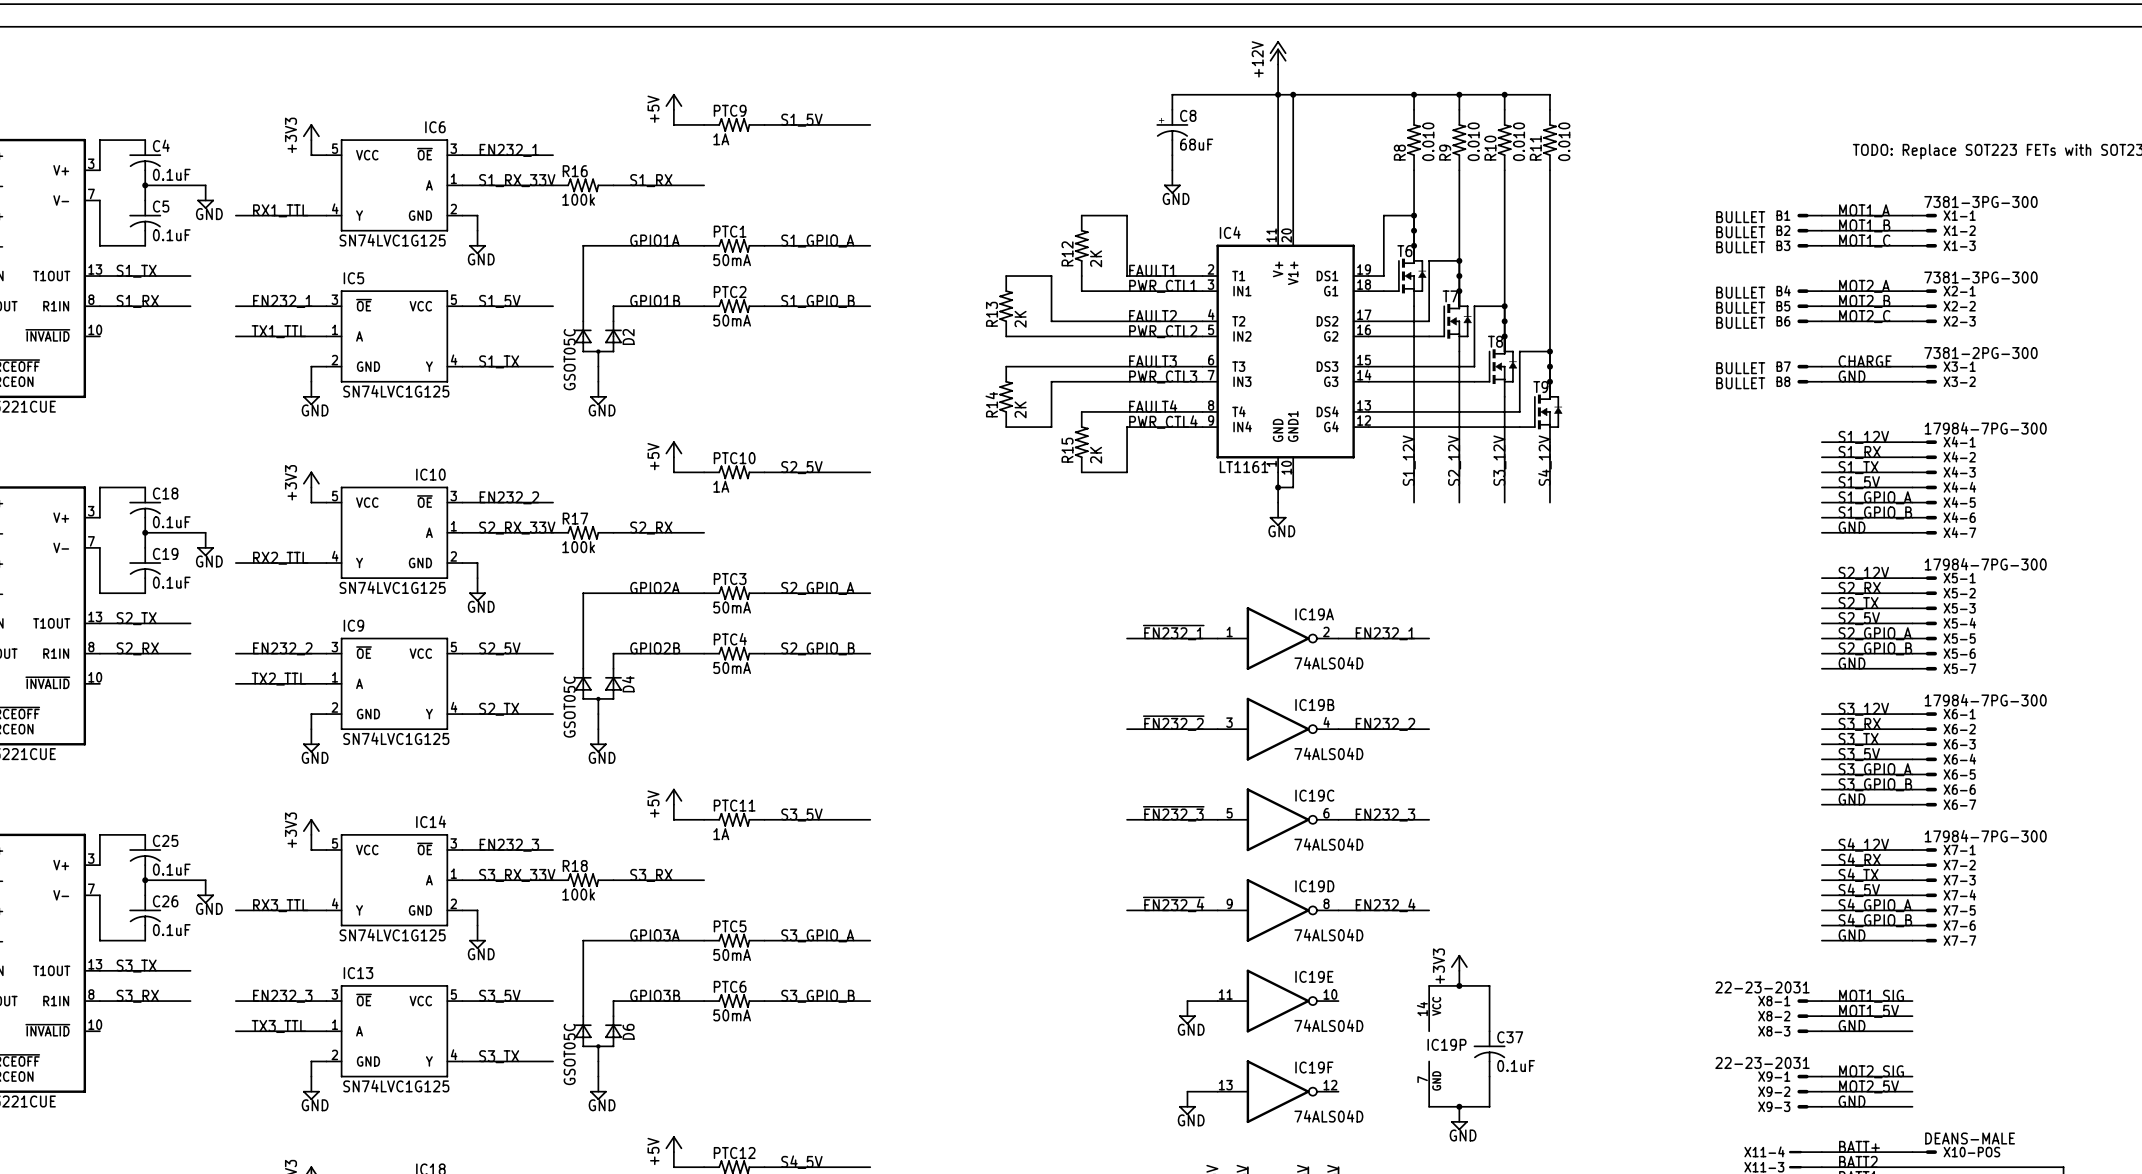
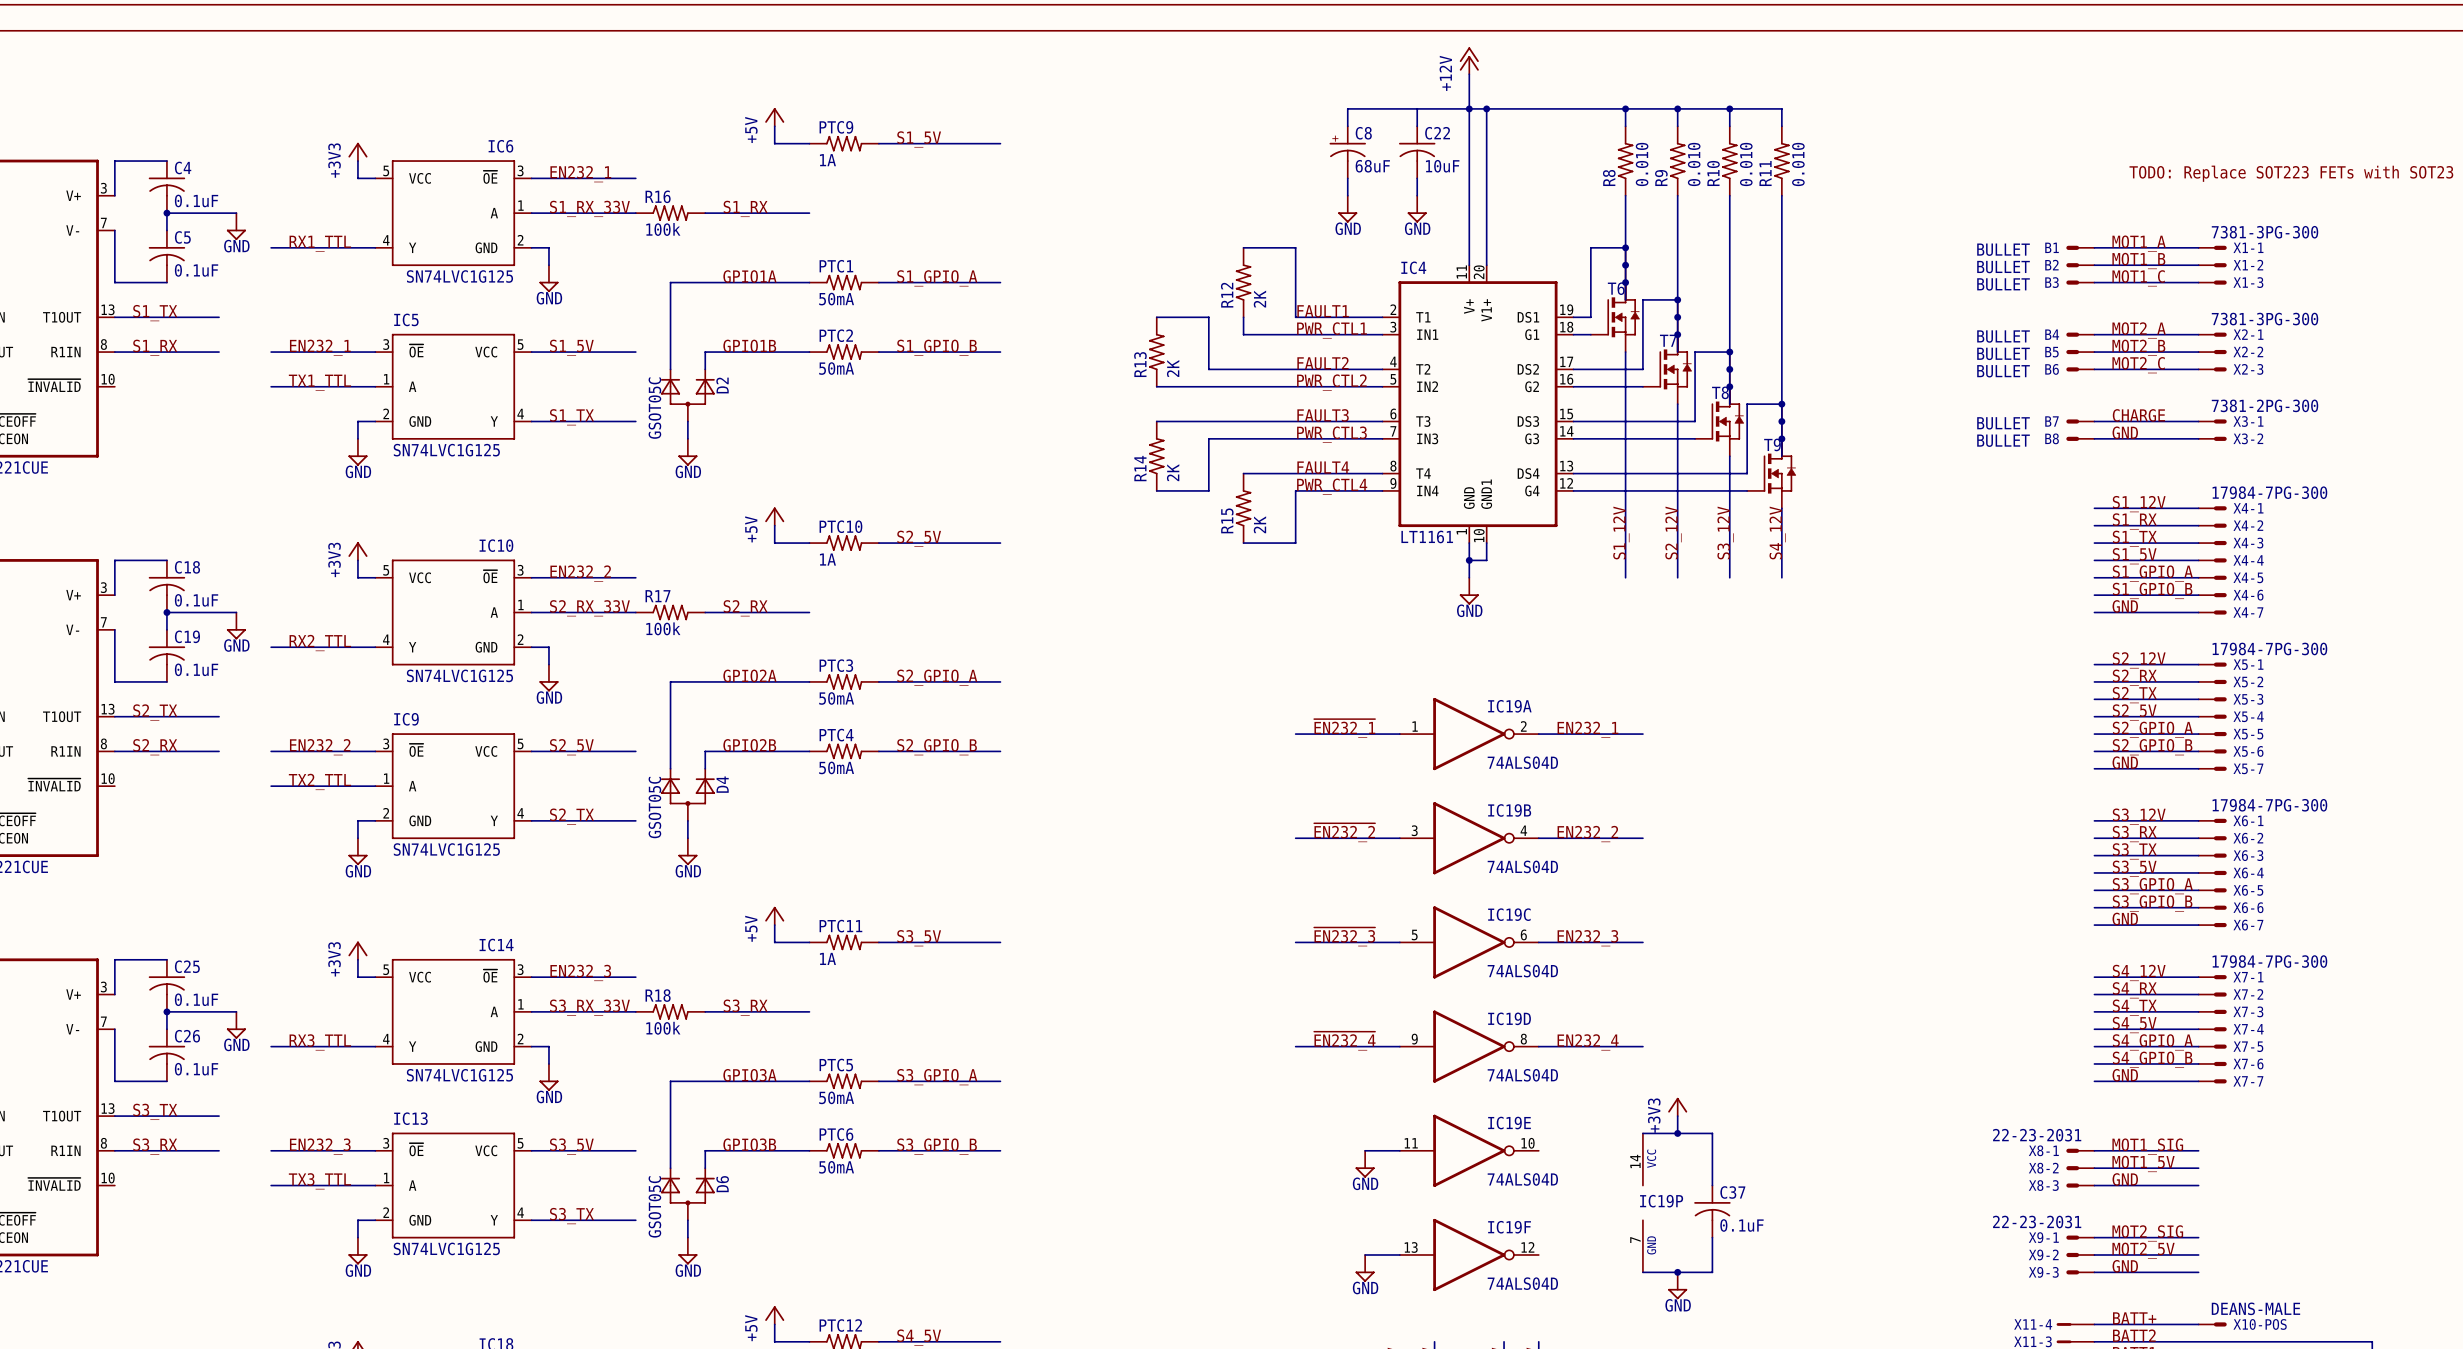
wire: none -> (1417, 108) (1417, 126)
C22: none -> 10uF (1417, 152)
wire: none -> (1417, 178) (1417, 195)
power symbol: none -> GND (1417, 209)

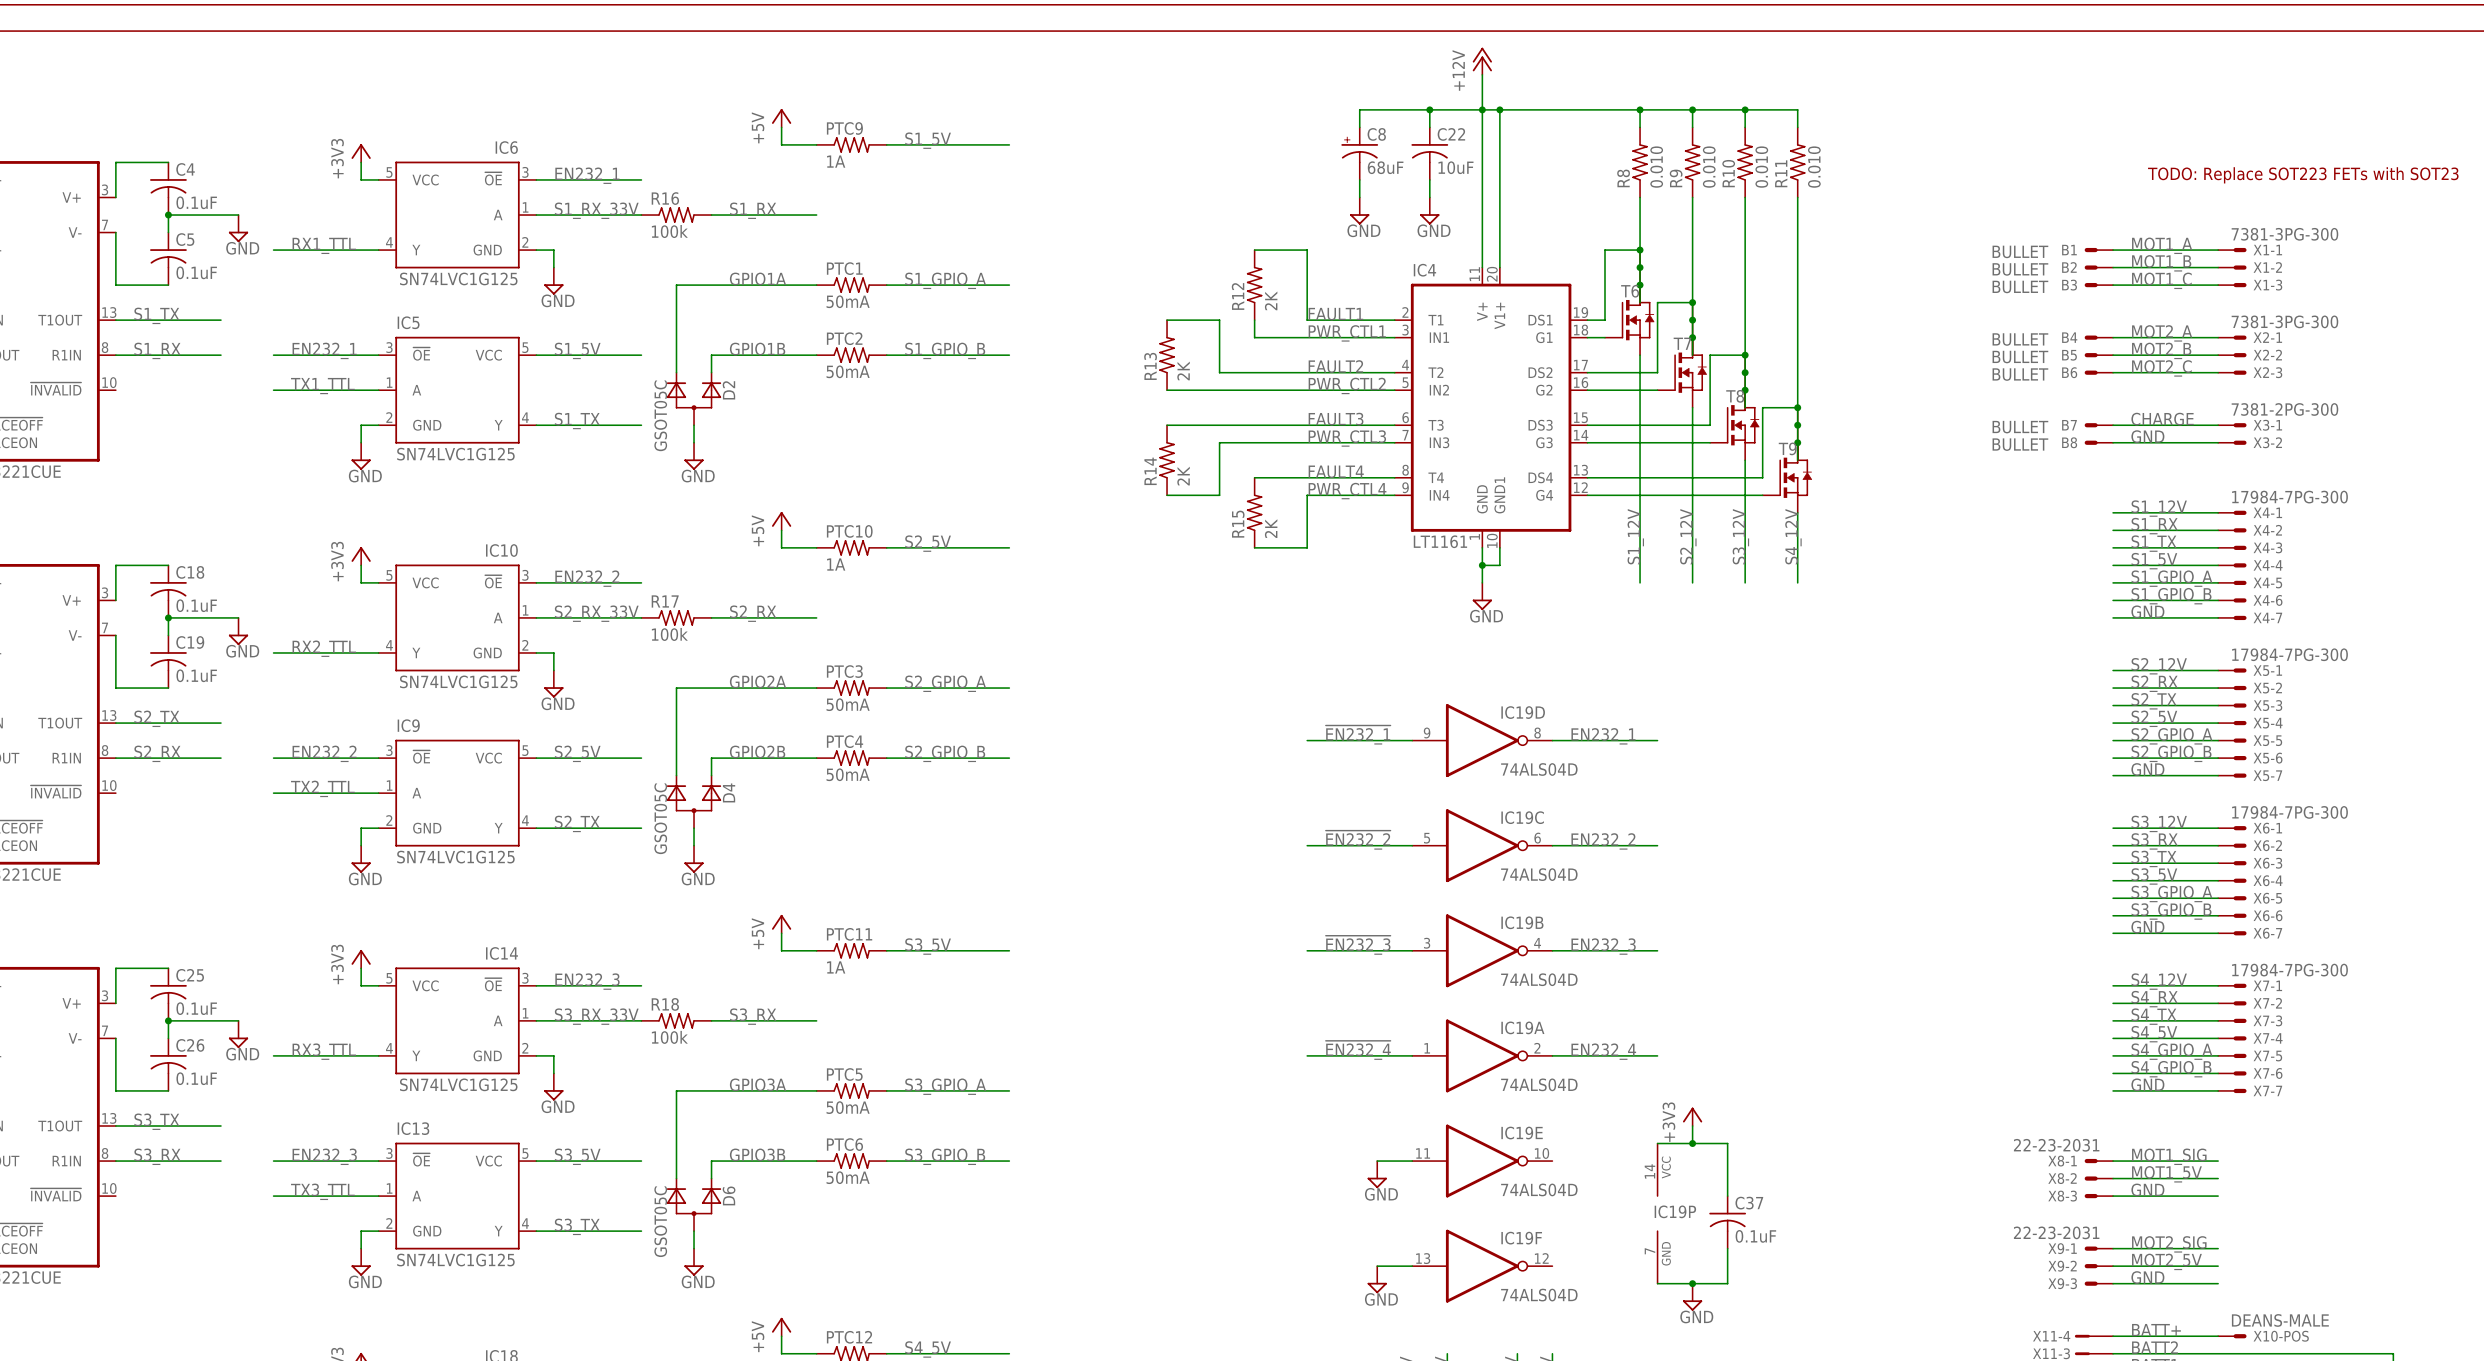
junction: none -> (1429, 109)
IC19A position: (1469, 734) -> (1482, 1055)
IC19B position: (1469, 838) -> (1482, 950)
IC19C position: (1469, 942) -> (1482, 845)
IC19D position: (1469, 1046) -> (1482, 740)

